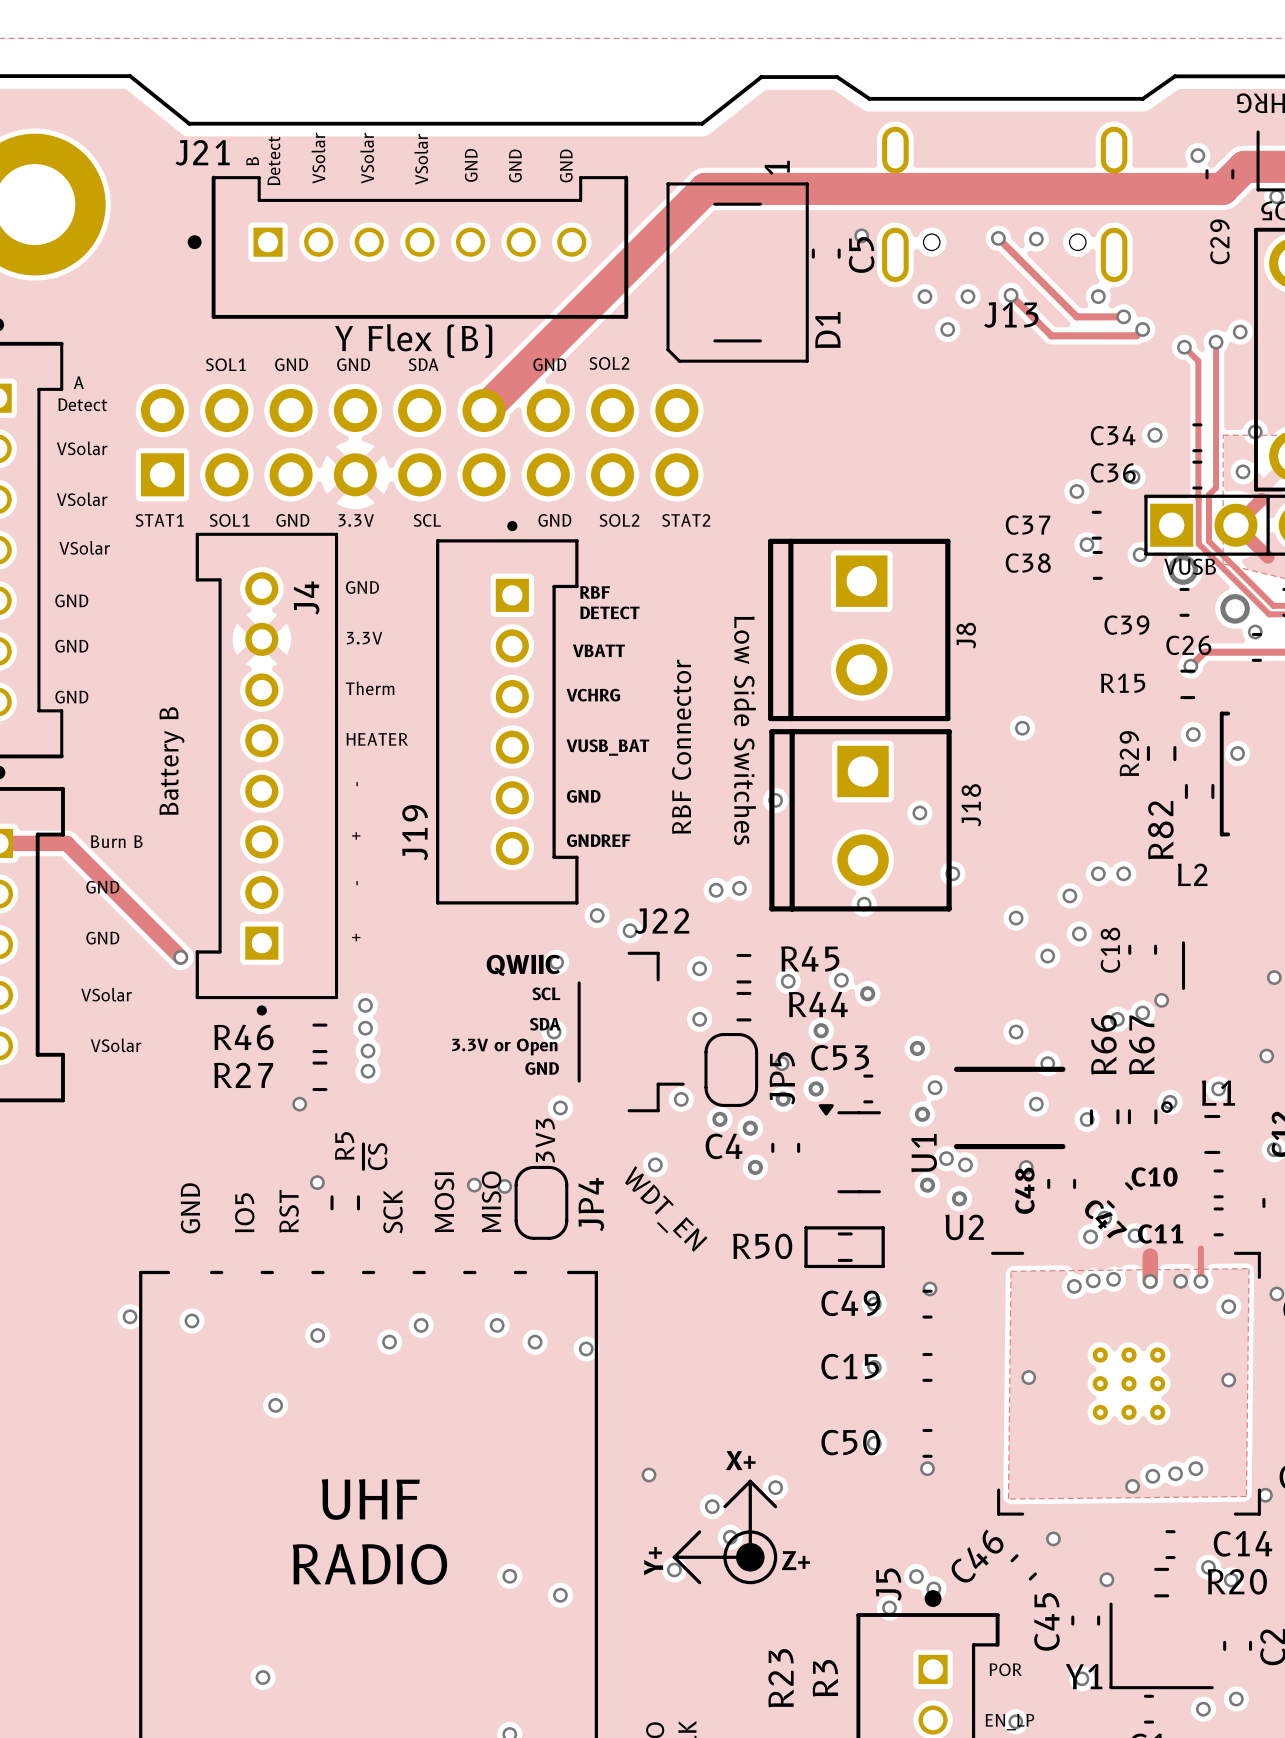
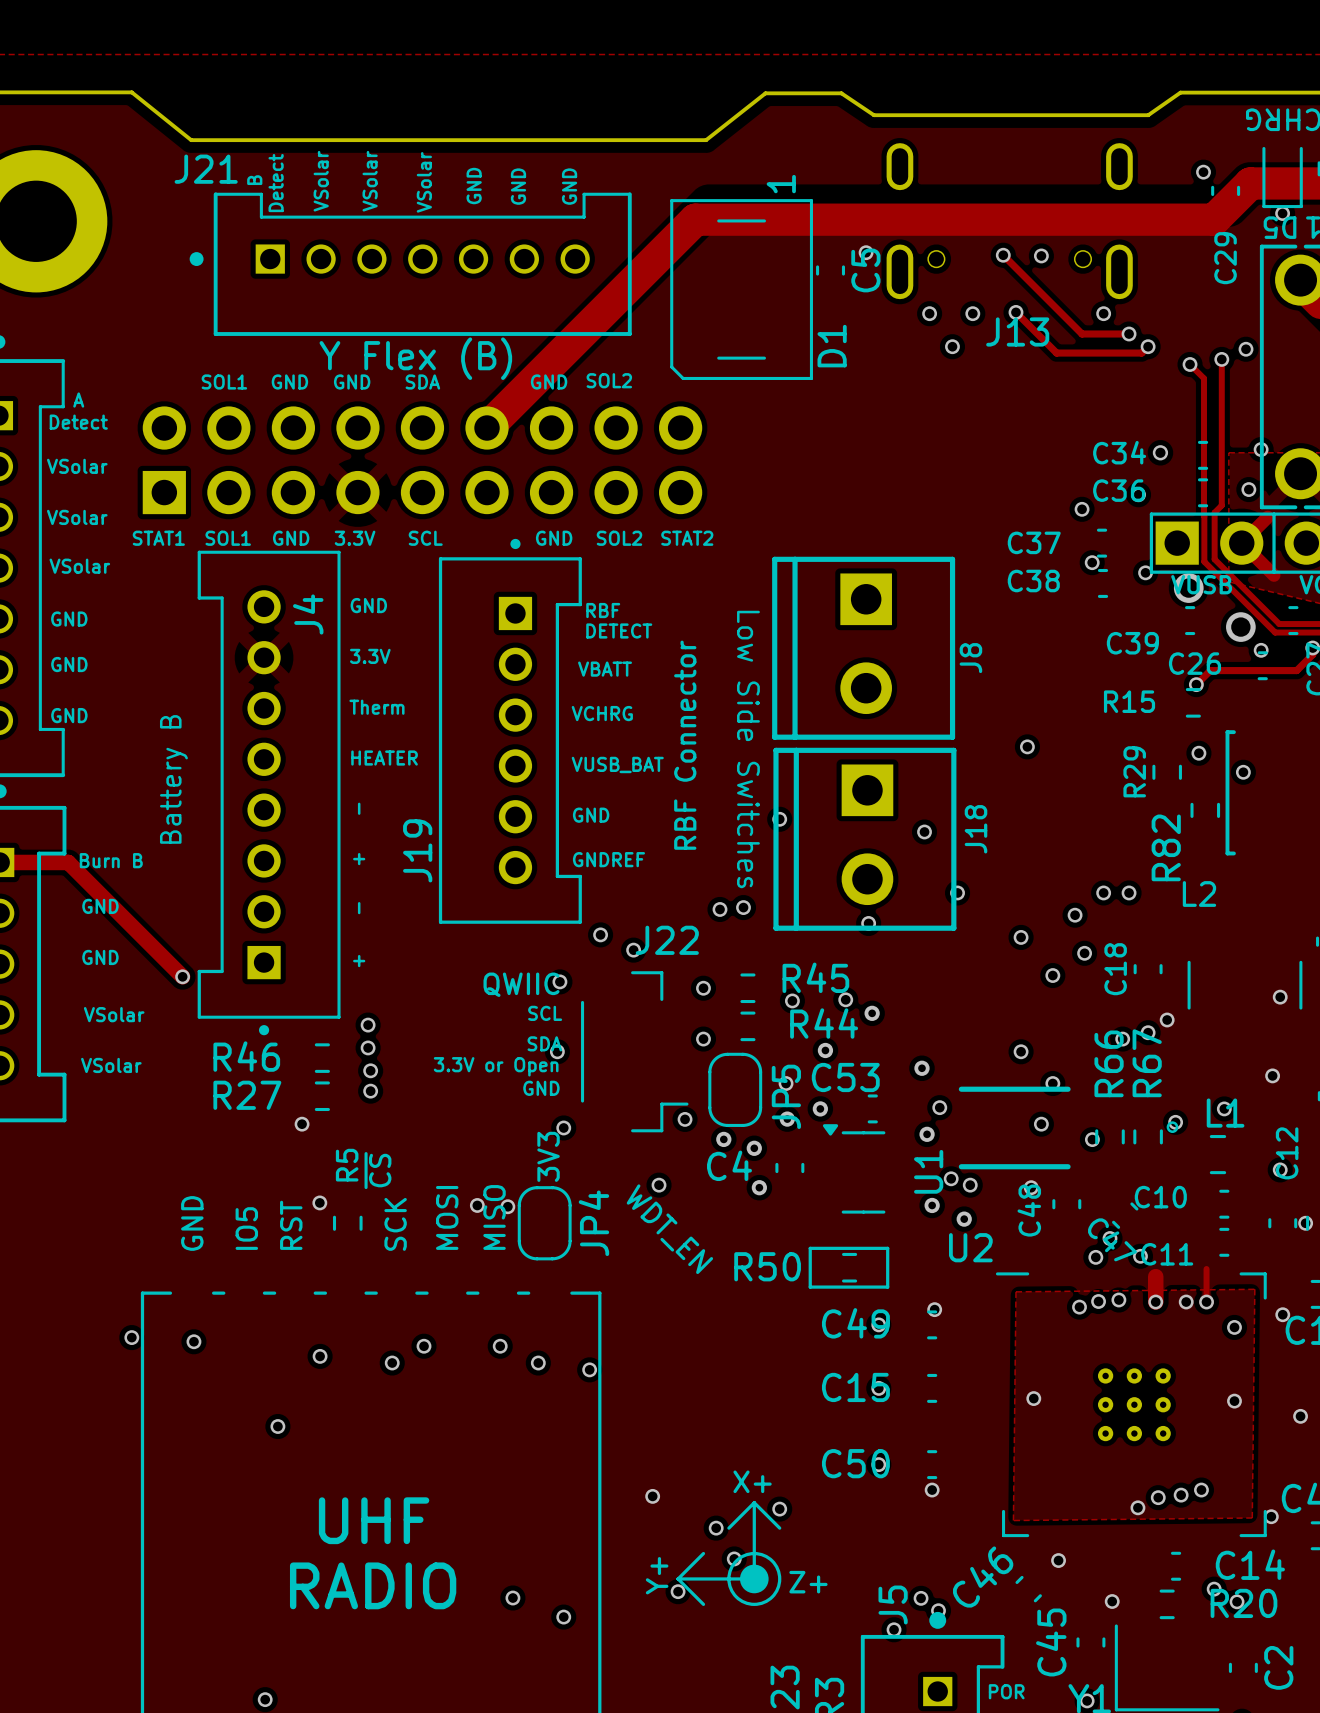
track: (1222, 188) (705, 188) (691, 202) -> (1228, 205) (1214, 219) (695, 219)

